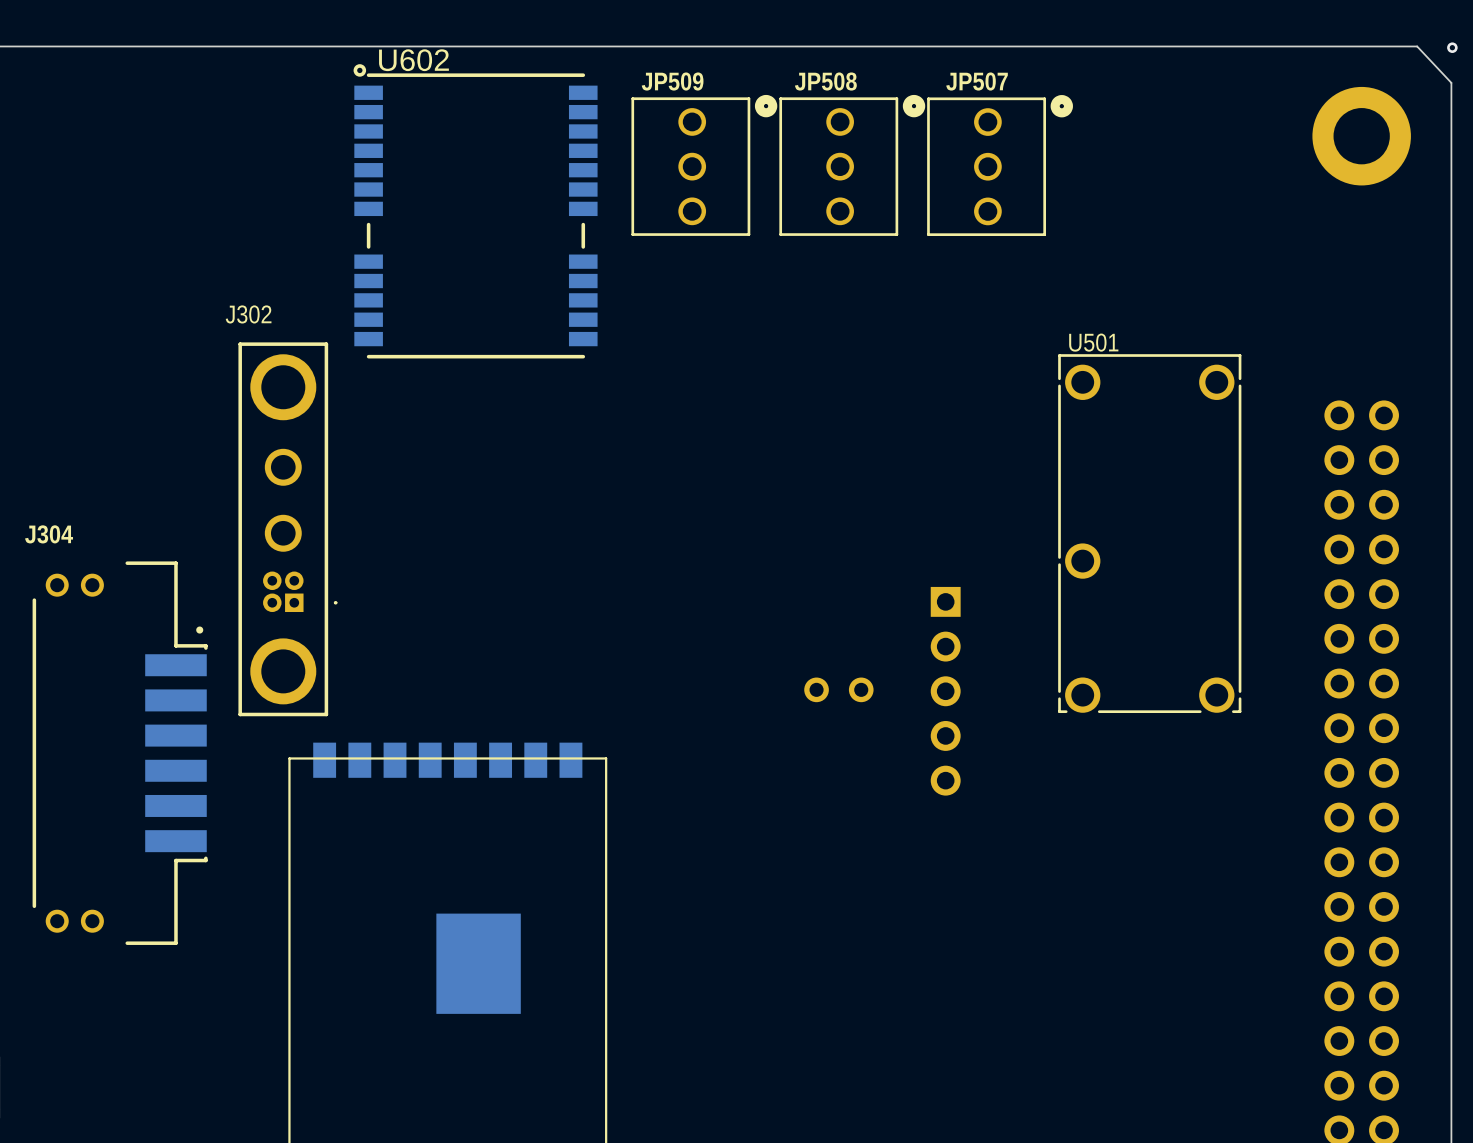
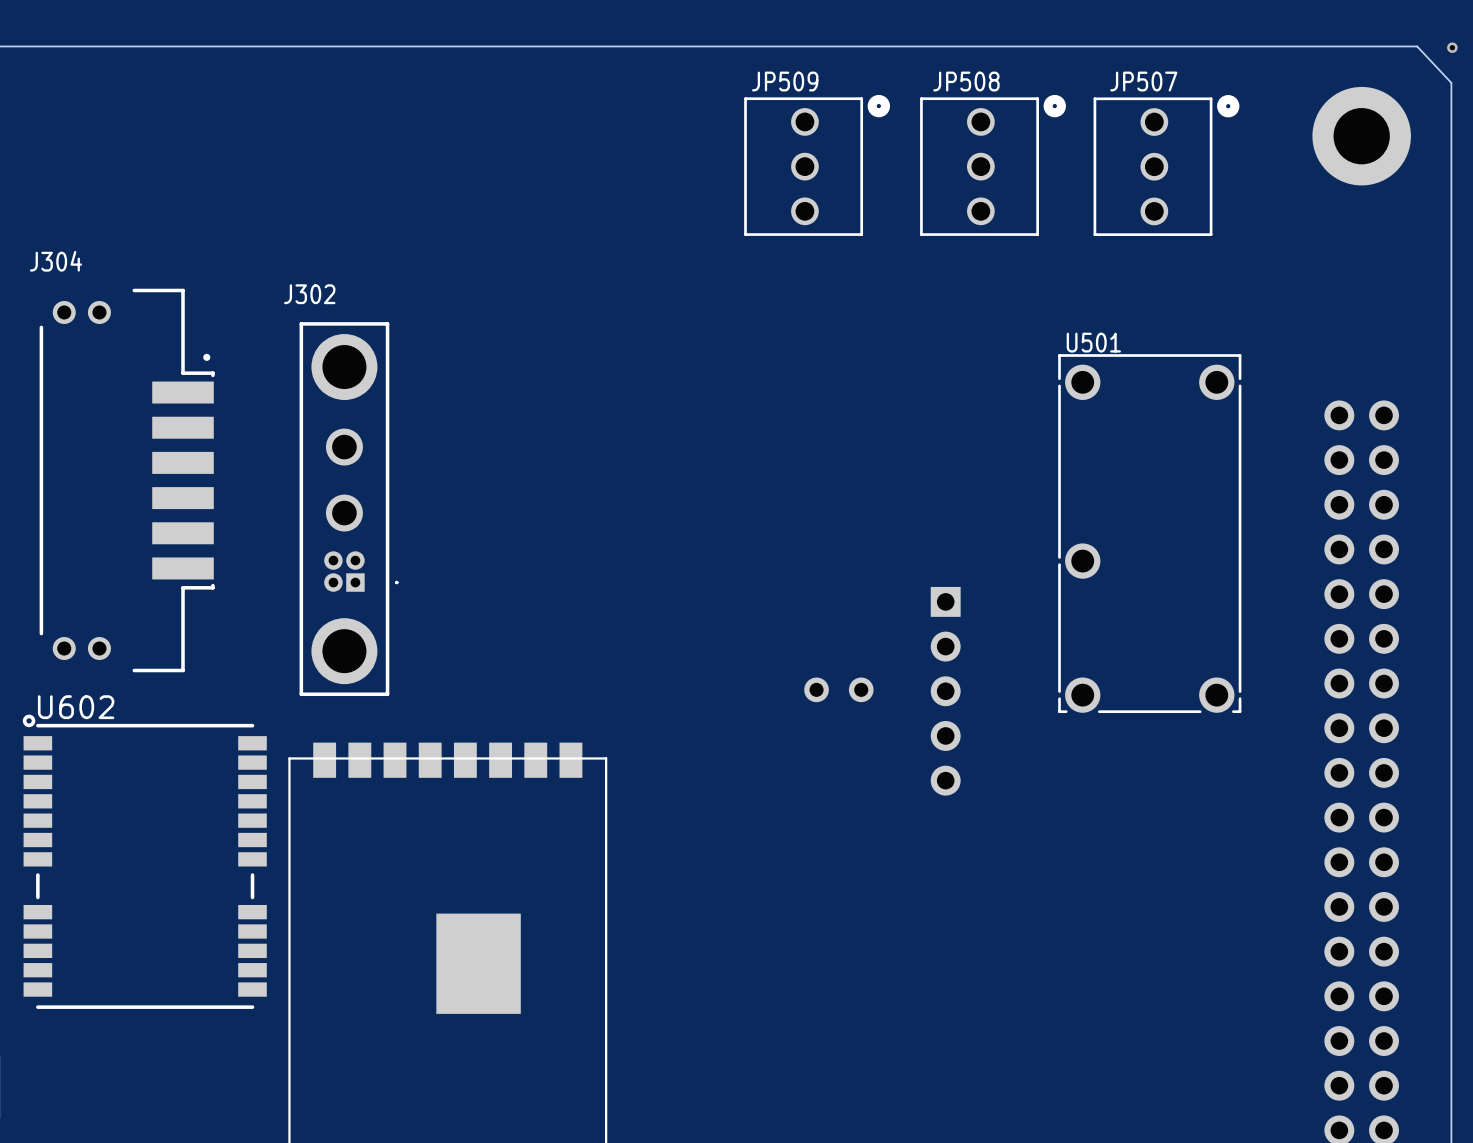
JP509 position: (704, 165) -> (817, 165)
JP508 position: (852, 165) -> (993, 165)
JP507 position: (1000, 165) -> (1166, 165)
part: (475, 211) -> none
J302 position: (287, 529) -> (349, 509)
J304 position: (120, 753) -> (127, 480)
part: none -> (144, 861)

